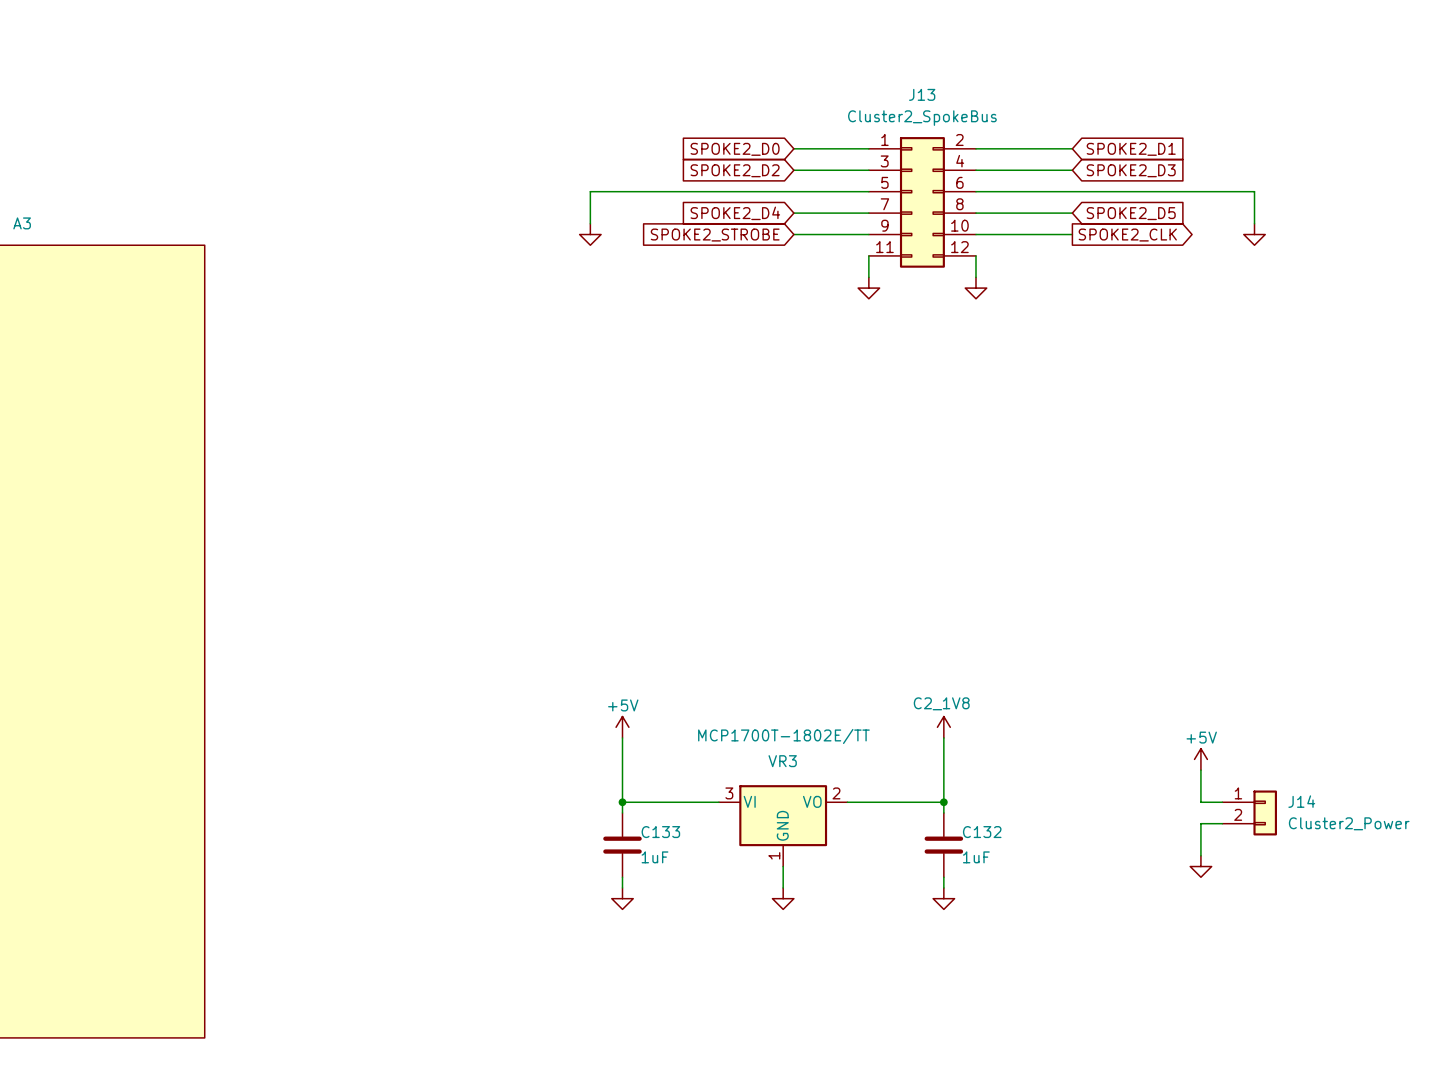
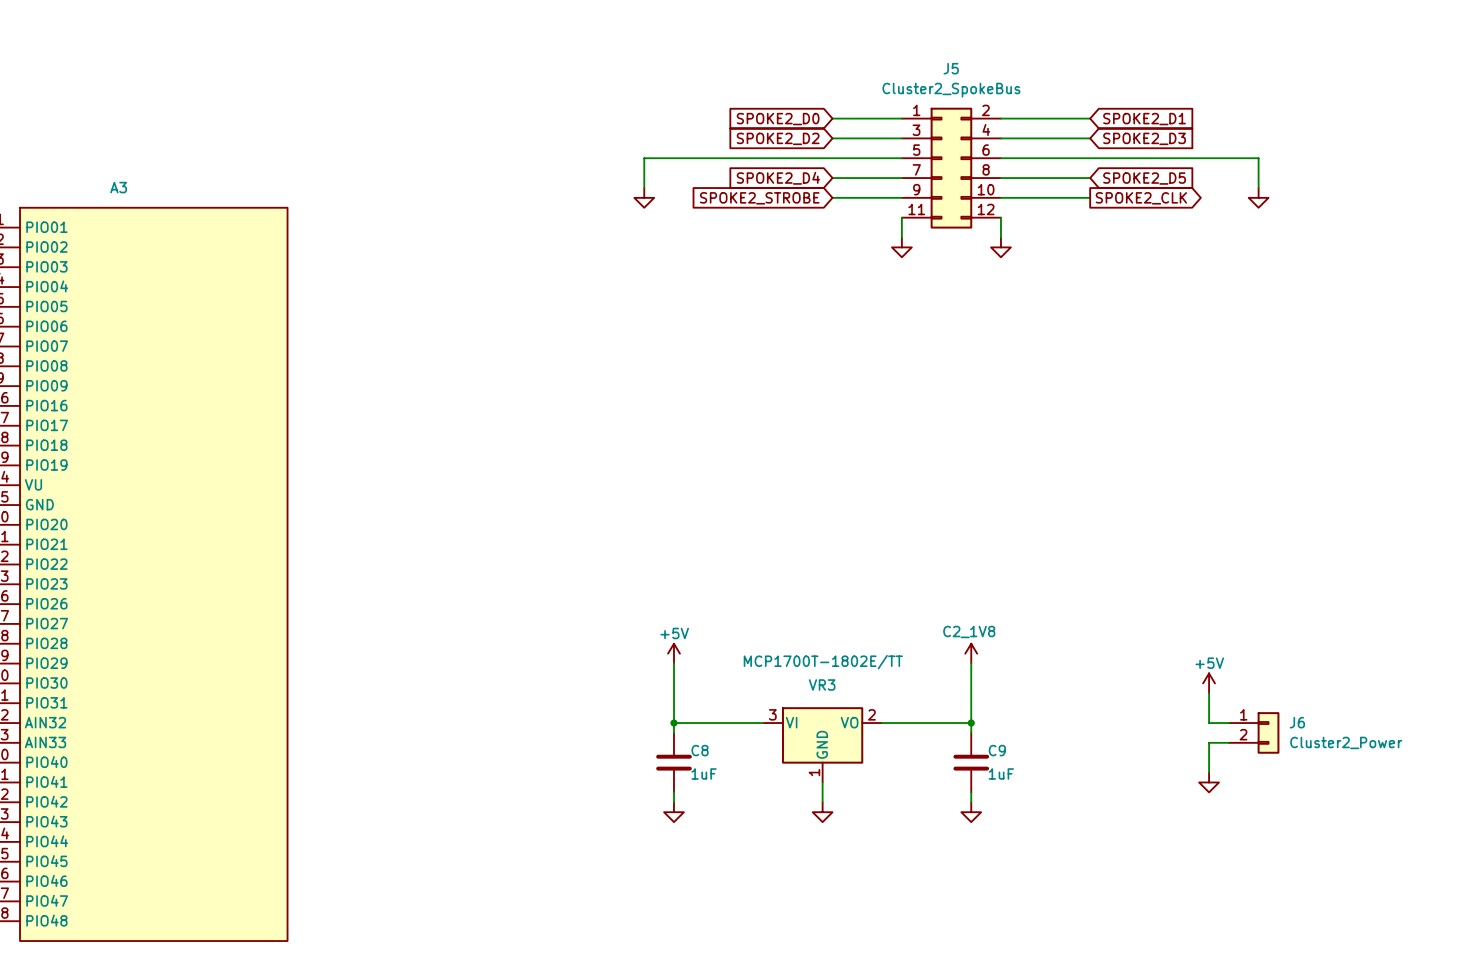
J13 name: J13 (922, 94) -> J5 (951, 68)
J14 name: J14 (1301, 801) -> J6 (1297, 722)
C133 name: C133 (660, 832) -> C8 (700, 750)
C132 name: C132 (982, 832) -> C9 (997, 750)

